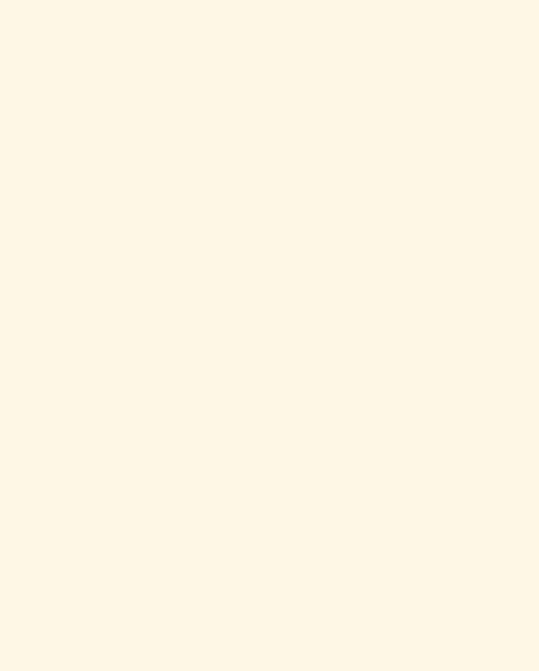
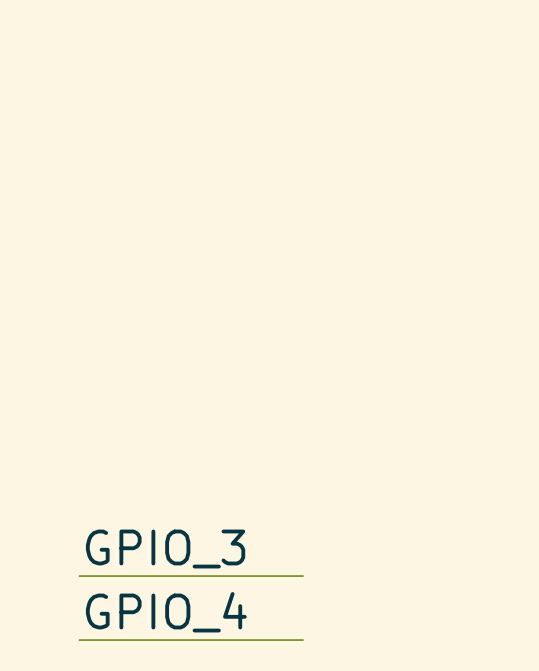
label: none -> GPIO_3 (165, 549)
wire: none -> (79, 576) (303, 576)
label: none -> GPIO_4 (166, 612)
wire: none -> (79, 640) (303, 640)

